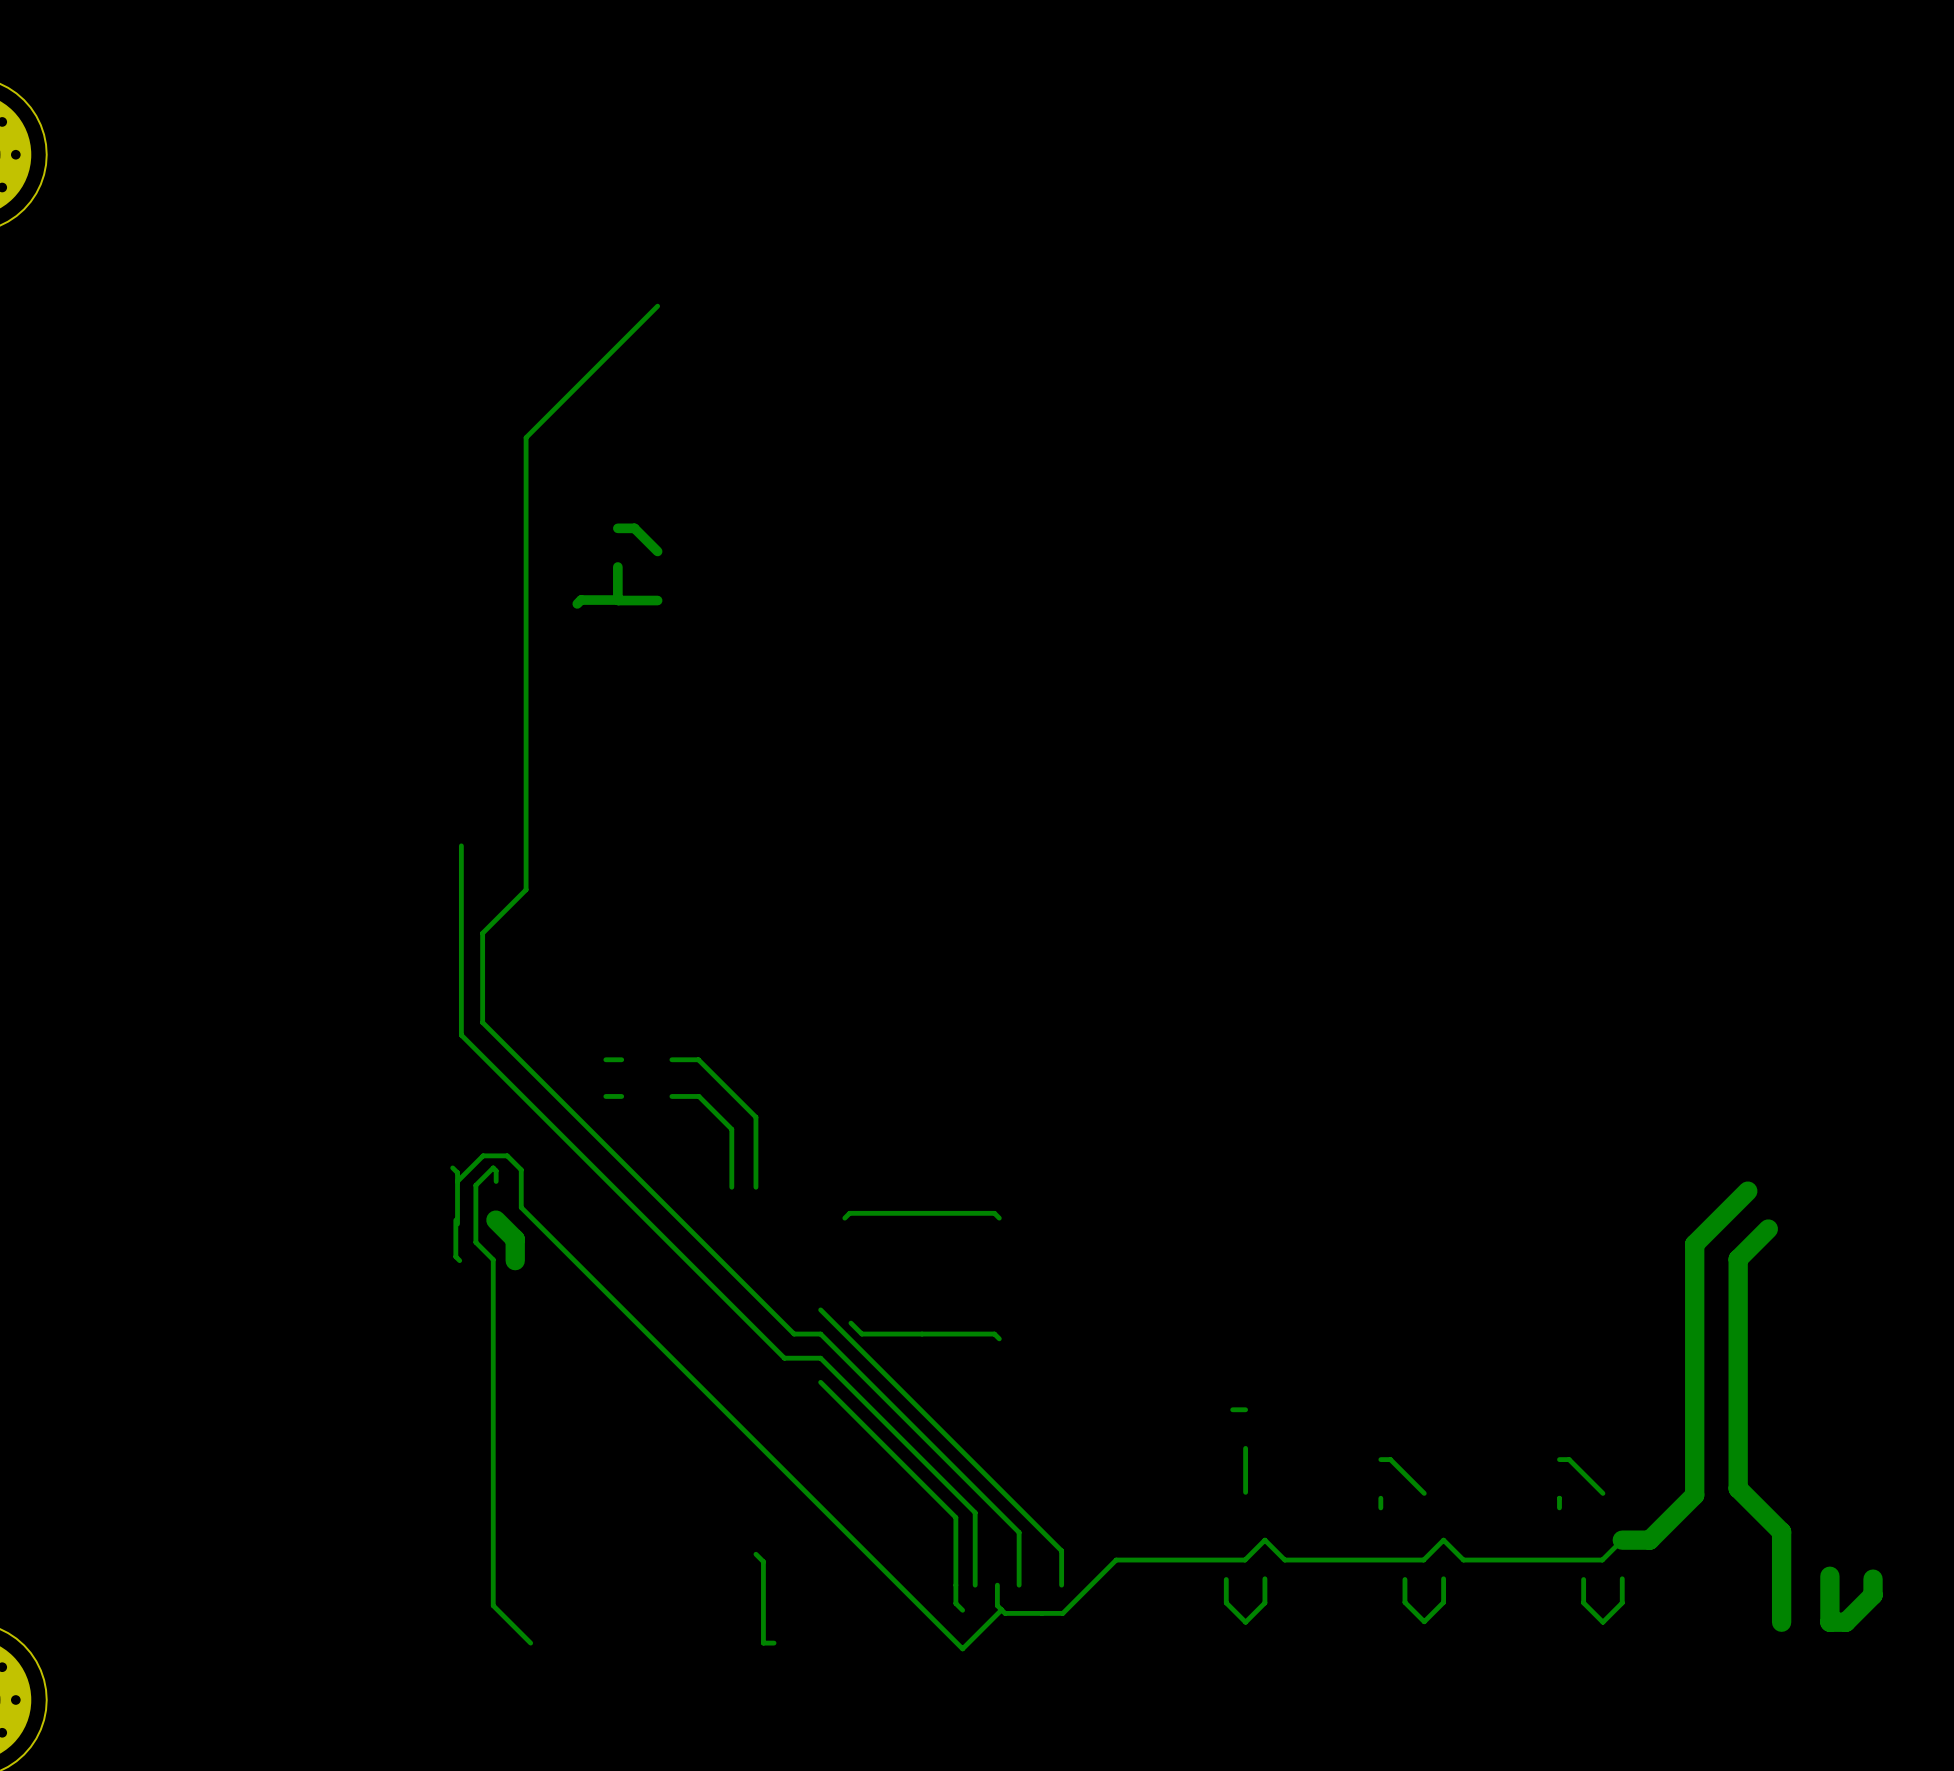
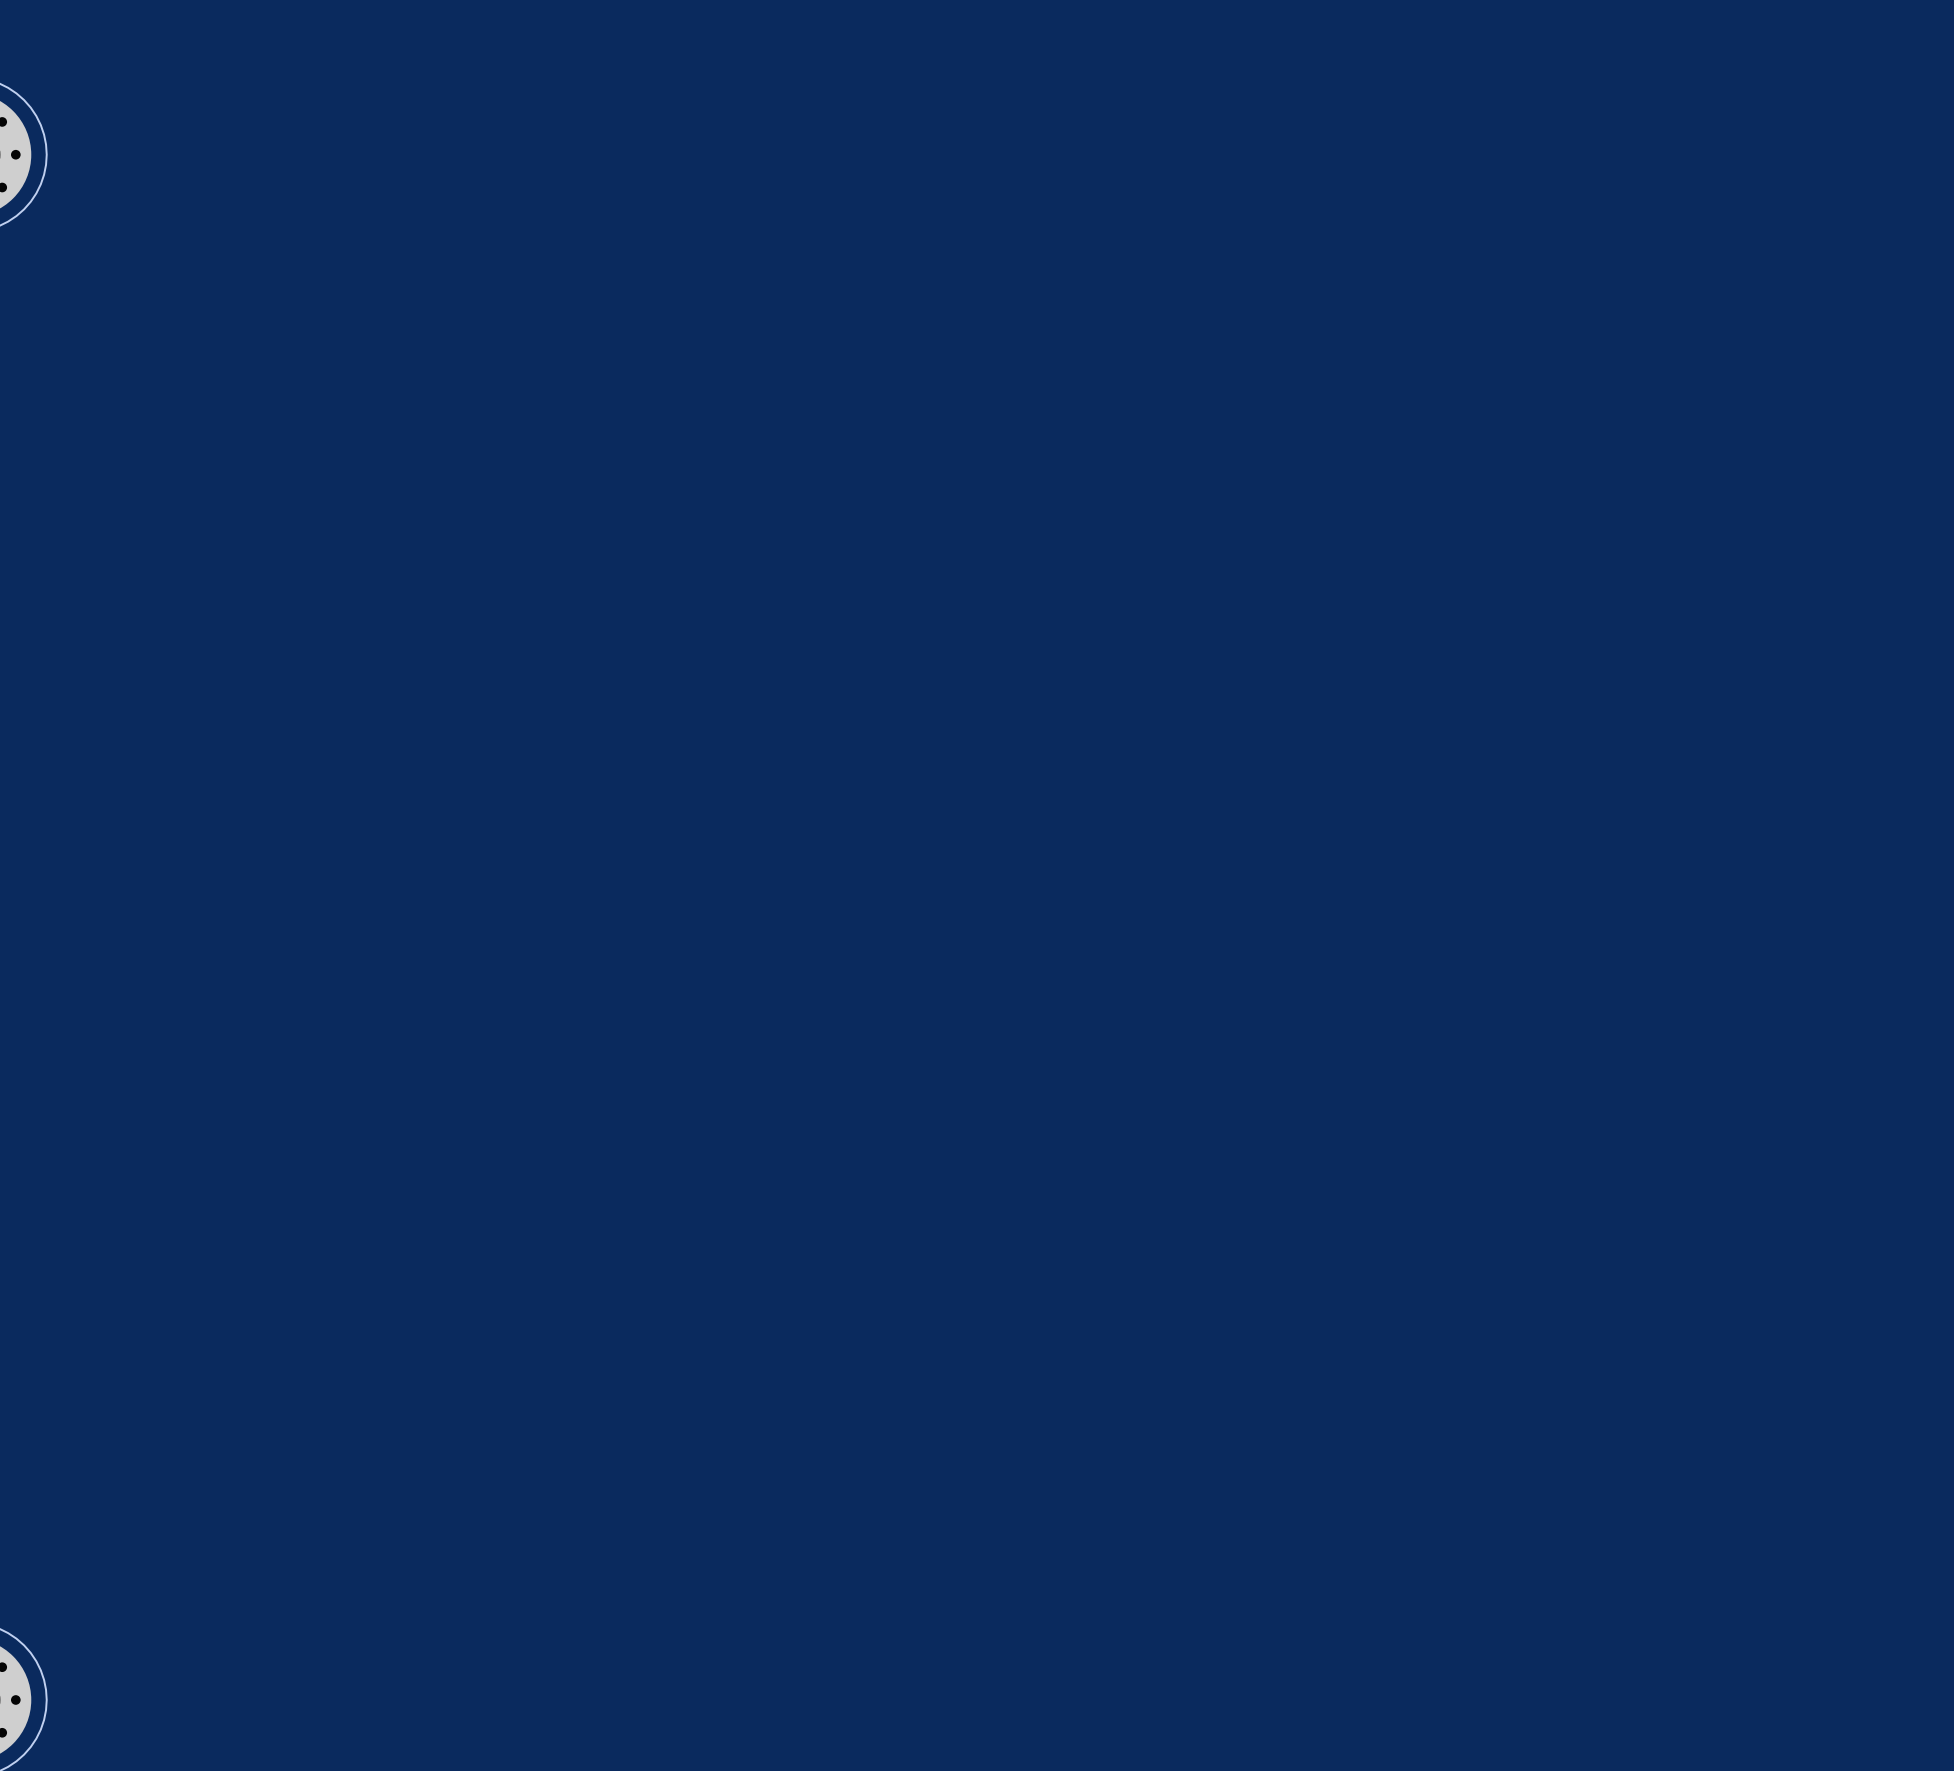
track: (657, 306) (526, 437) (526, 889) (482, 933) (482, 1022) (794, 1334) (820, 1334) (1019, 1532) (1019, 1585) -> none
track: (617, 528) (634, 528) (657, 551) -> none
track: (617, 566) (617, 600) -> none
track: (617, 600) (581, 600) (577, 603) -> none
track: (617, 600) (657, 600) -> none
track: (461, 845) (461, 1035) (784, 1358) (820, 1358) (975, 1512) (975, 1585) -> none
track: (621, 1059) (605, 1059) -> none
track: (671, 1059) (698, 1059) (755, 1117) (755, 1187) -> none
track: (621, 1096) (605, 1096) -> none
track: (671, 1096) (698, 1096) (731, 1129) (731, 1187) -> none
track: (452, 1167) (457, 1172) (457, 1181) (483, 1155) (507, 1155) (521, 1169) (521, 1207) (962, 1648) (1001, 1609) -> none
track: (496, 1181) (496, 1170) (493, 1167) (475, 1185) (475, 1242) (493, 1259) (493, 1605) (530, 1643) -> none
track: (457, 1182) (457, 1223) -> none
track: (1747, 1191) (1694, 1244) (1694, 1495) (1649, 1540) (1622, 1540) (1602, 1560) (1463, 1560) (1443, 1540) (1423, 1560) (1284, 1560) (1264, 1540) (1245, 1560) (1116, 1560) (1062, 1613) (1005, 1613) (997, 1605) (997, 1585) -> none
track: (999, 1218) (994, 1213) (849, 1213) (844, 1218) -> none
track: (455, 1220) (455, 1256) (459, 1260) -> none
track: (495, 1220) (515, 1239) (515, 1260) -> none
track: (1768, 1229) (1738, 1259) (1738, 1488) (1781, 1532) (1781, 1622) -> none
track: (820, 1309) (1061, 1550) (1061, 1585) -> none
track: (850, 1323) (861, 1334) (994, 1334) (999, 1338) -> none
track: (820, 1382) (955, 1517) (955, 1603) (962, 1610) -> none
track: (1245, 1409) (1232, 1409) -> none
track: (1245, 1448) (1245, 1492) -> none
track: (1380, 1459) (1390, 1459) (1424, 1493) -> none
track: (1559, 1459) (1569, 1459) (1602, 1493) -> none
track: (1380, 1498) (1380, 1507) -> none
track: (1559, 1498) (1559, 1507) -> none
track: (755, 1554) (763, 1561) (763, 1643) (774, 1643) -> none
track: (1829, 1576) (1829, 1622) (1845, 1622) (1873, 1595) (1873, 1579) -> none
track: (1264, 1578) (1264, 1602) (1245, 1622) (1226, 1602) (1226, 1579) -> none
track: (1443, 1578) (1443, 1602) (1424, 1621) (1404, 1602) (1404, 1579) -> none
track: (1622, 1578) (1622, 1602) (1602, 1622) (1583, 1602) (1583, 1579) -> none

